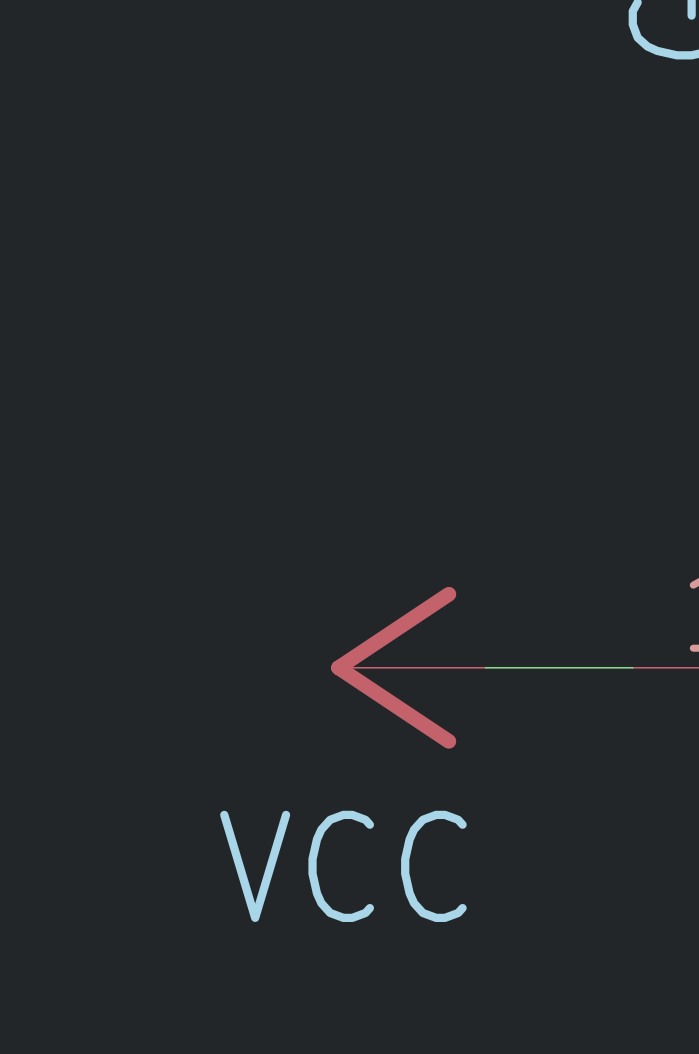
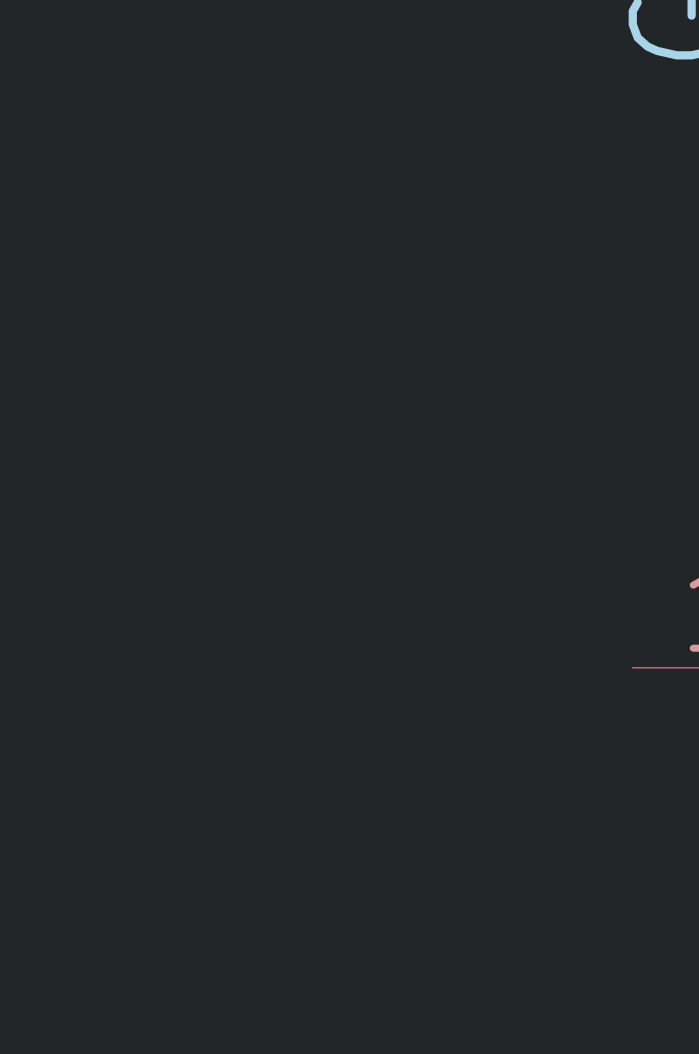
power symbol: VCC (408, 667) -> none
wire: (485, 667) (632, 667) -> none

